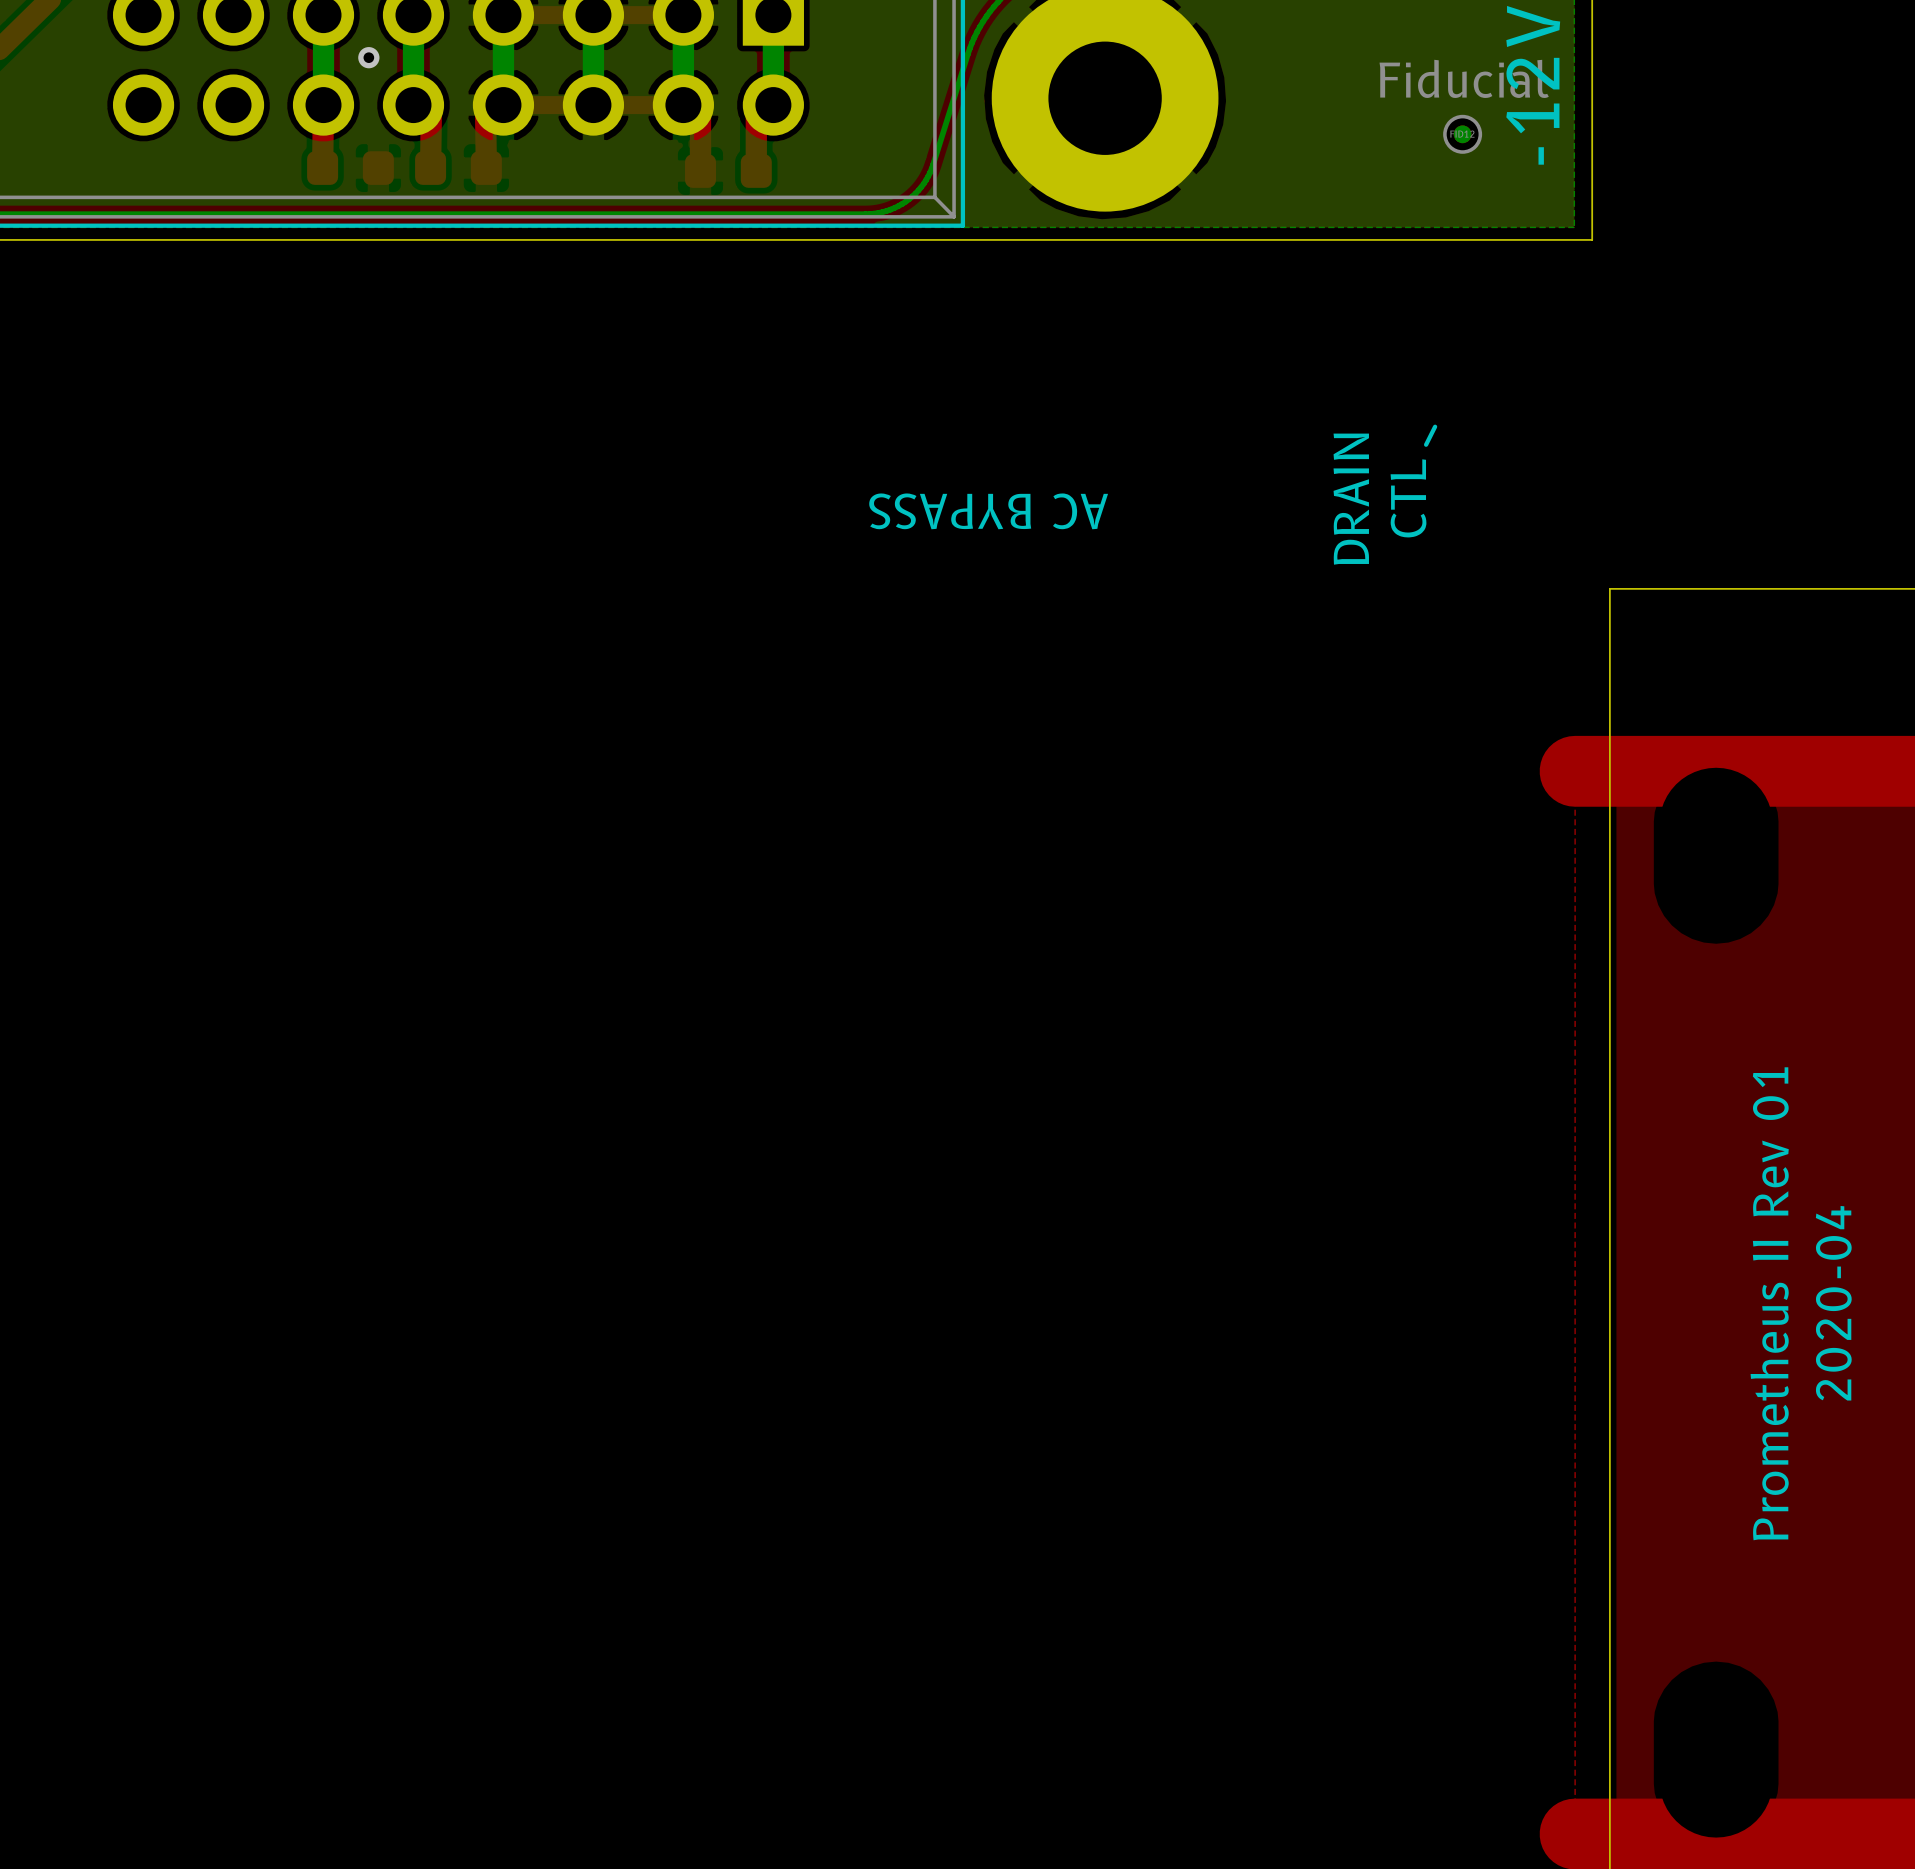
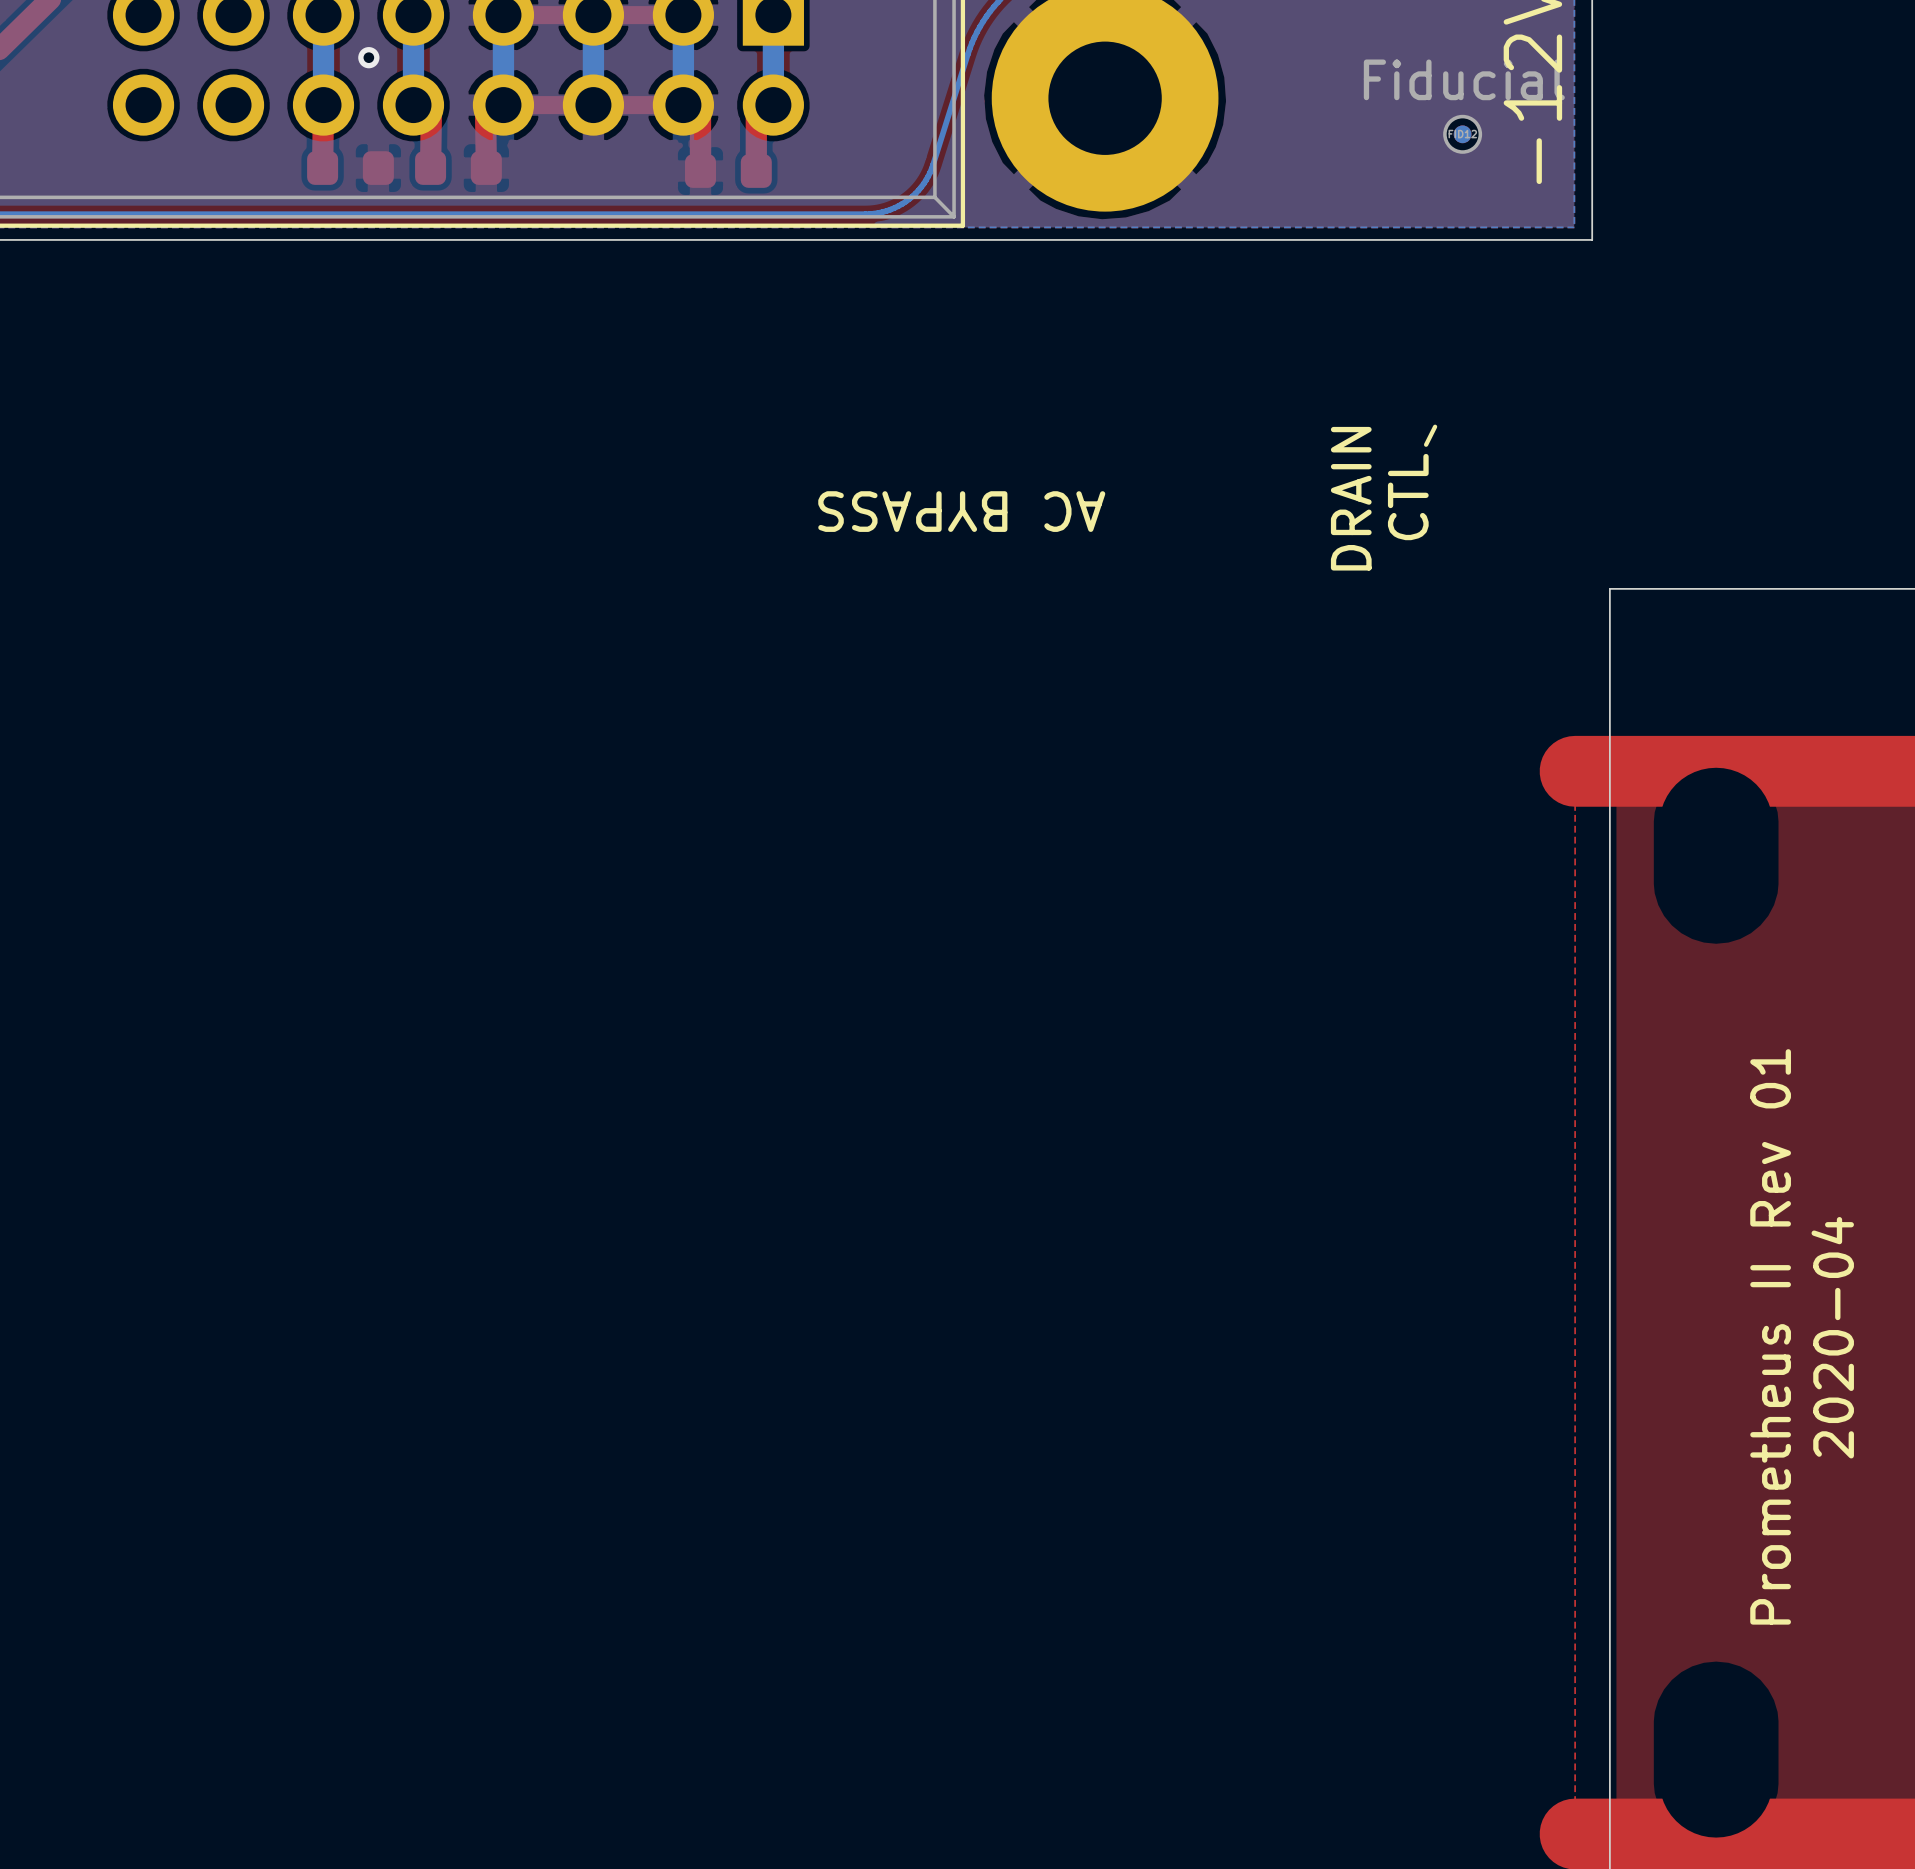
text position: Prometheus II Rev 01 (1769, 1303) -> Prometheus II Rev 01 (1770, 1336)
text position: 2020-04 (1833, 1303) -> 2020-04 (1832, 1337)

